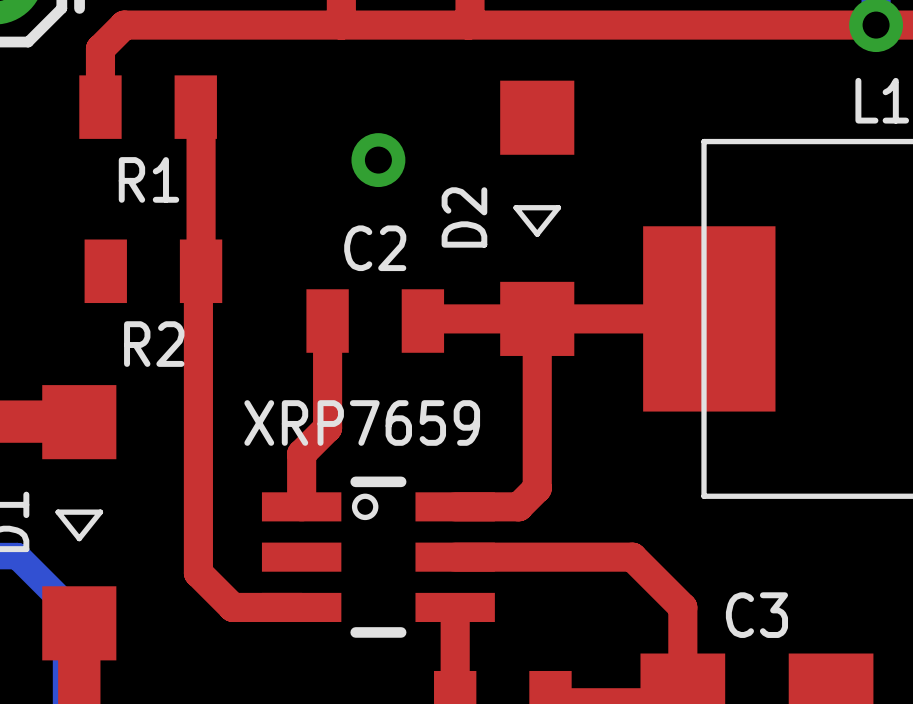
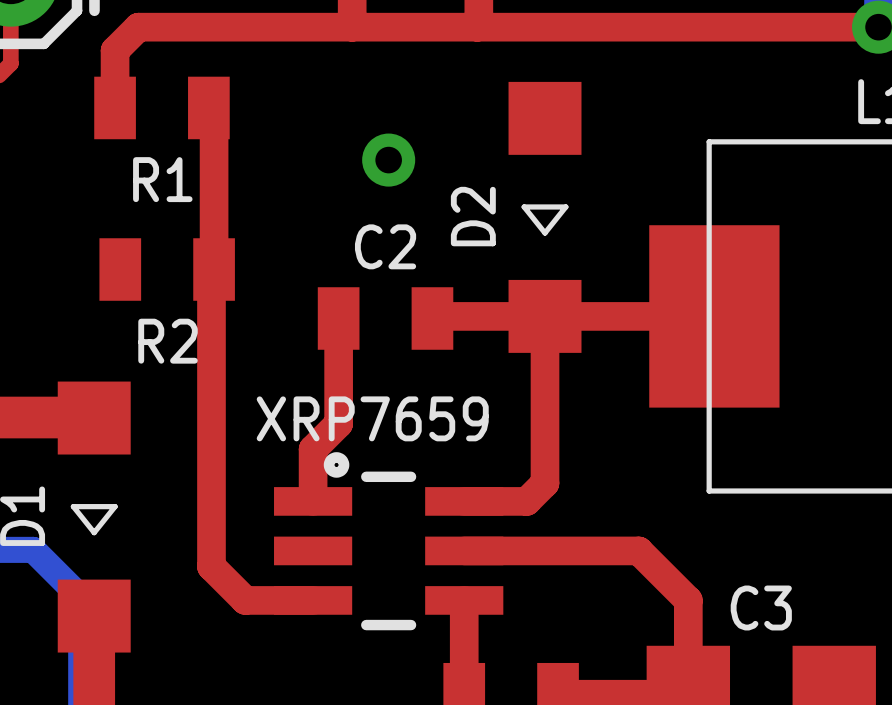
XRP7659 footprint: [261, 476, 495, 638] -> [274, 452, 504, 631]

